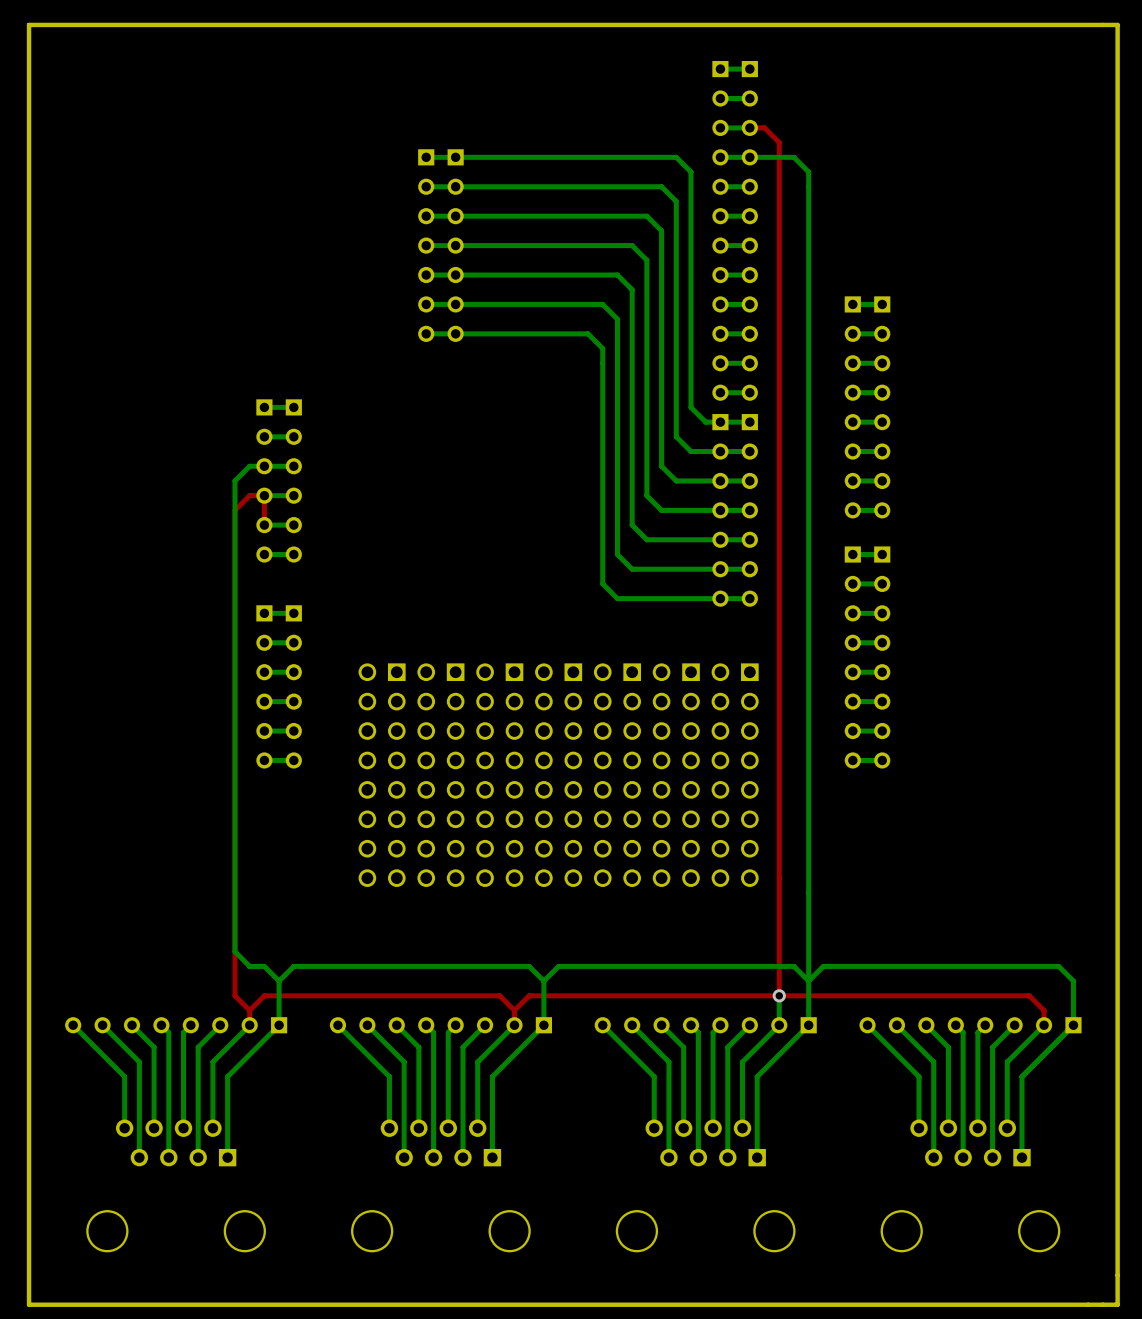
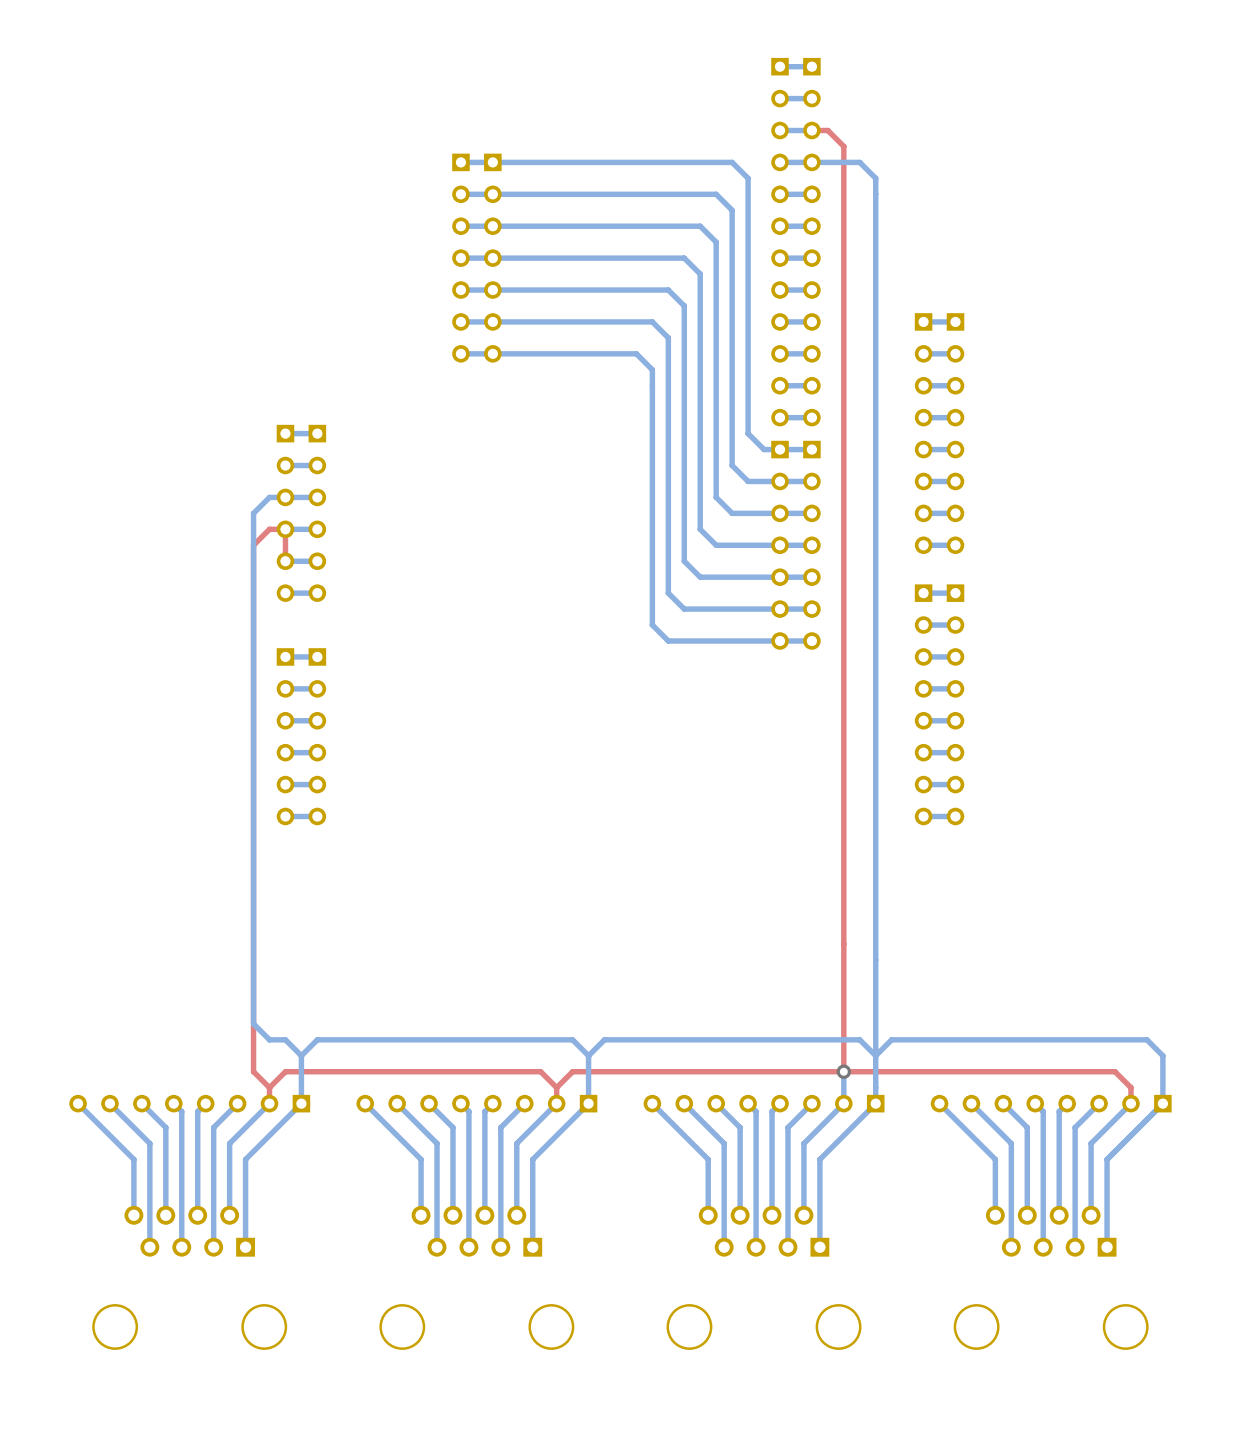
board edge: (1117, 24) (29, 24) (29, 1304) (1117, 1304) (1117, 24) -> none
part: (382, 775) -> none
part: (440, 775) -> none
part: (499, 775) -> none
part: (558, 775) -> none
part: (617, 775) -> none
part: (676, 775) -> none
part: (735, 775) -> none

